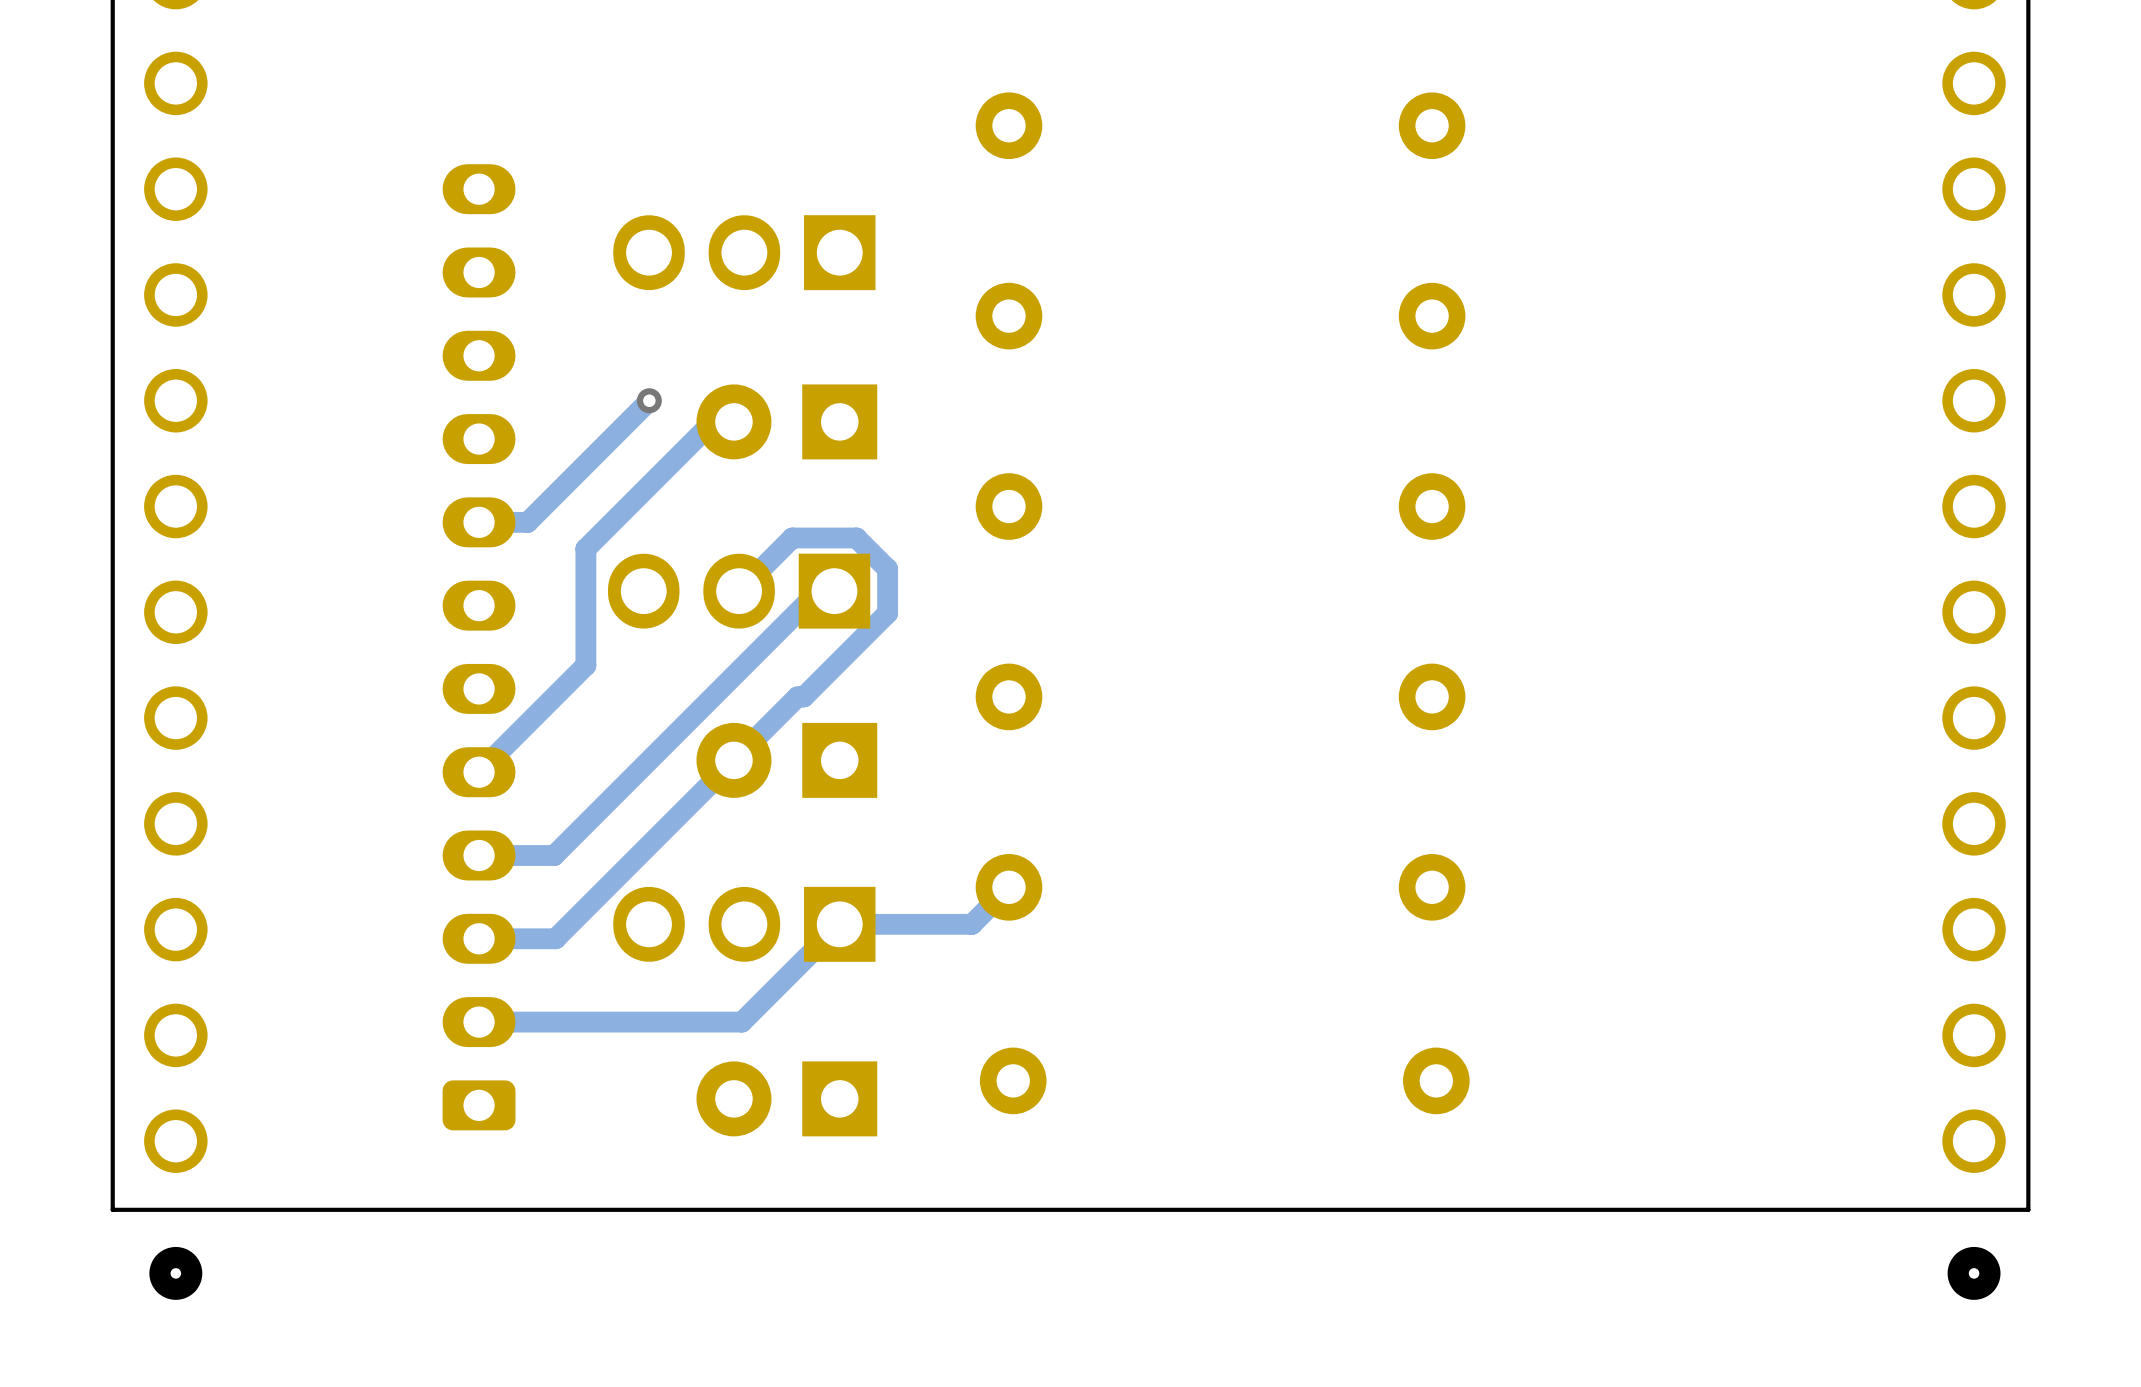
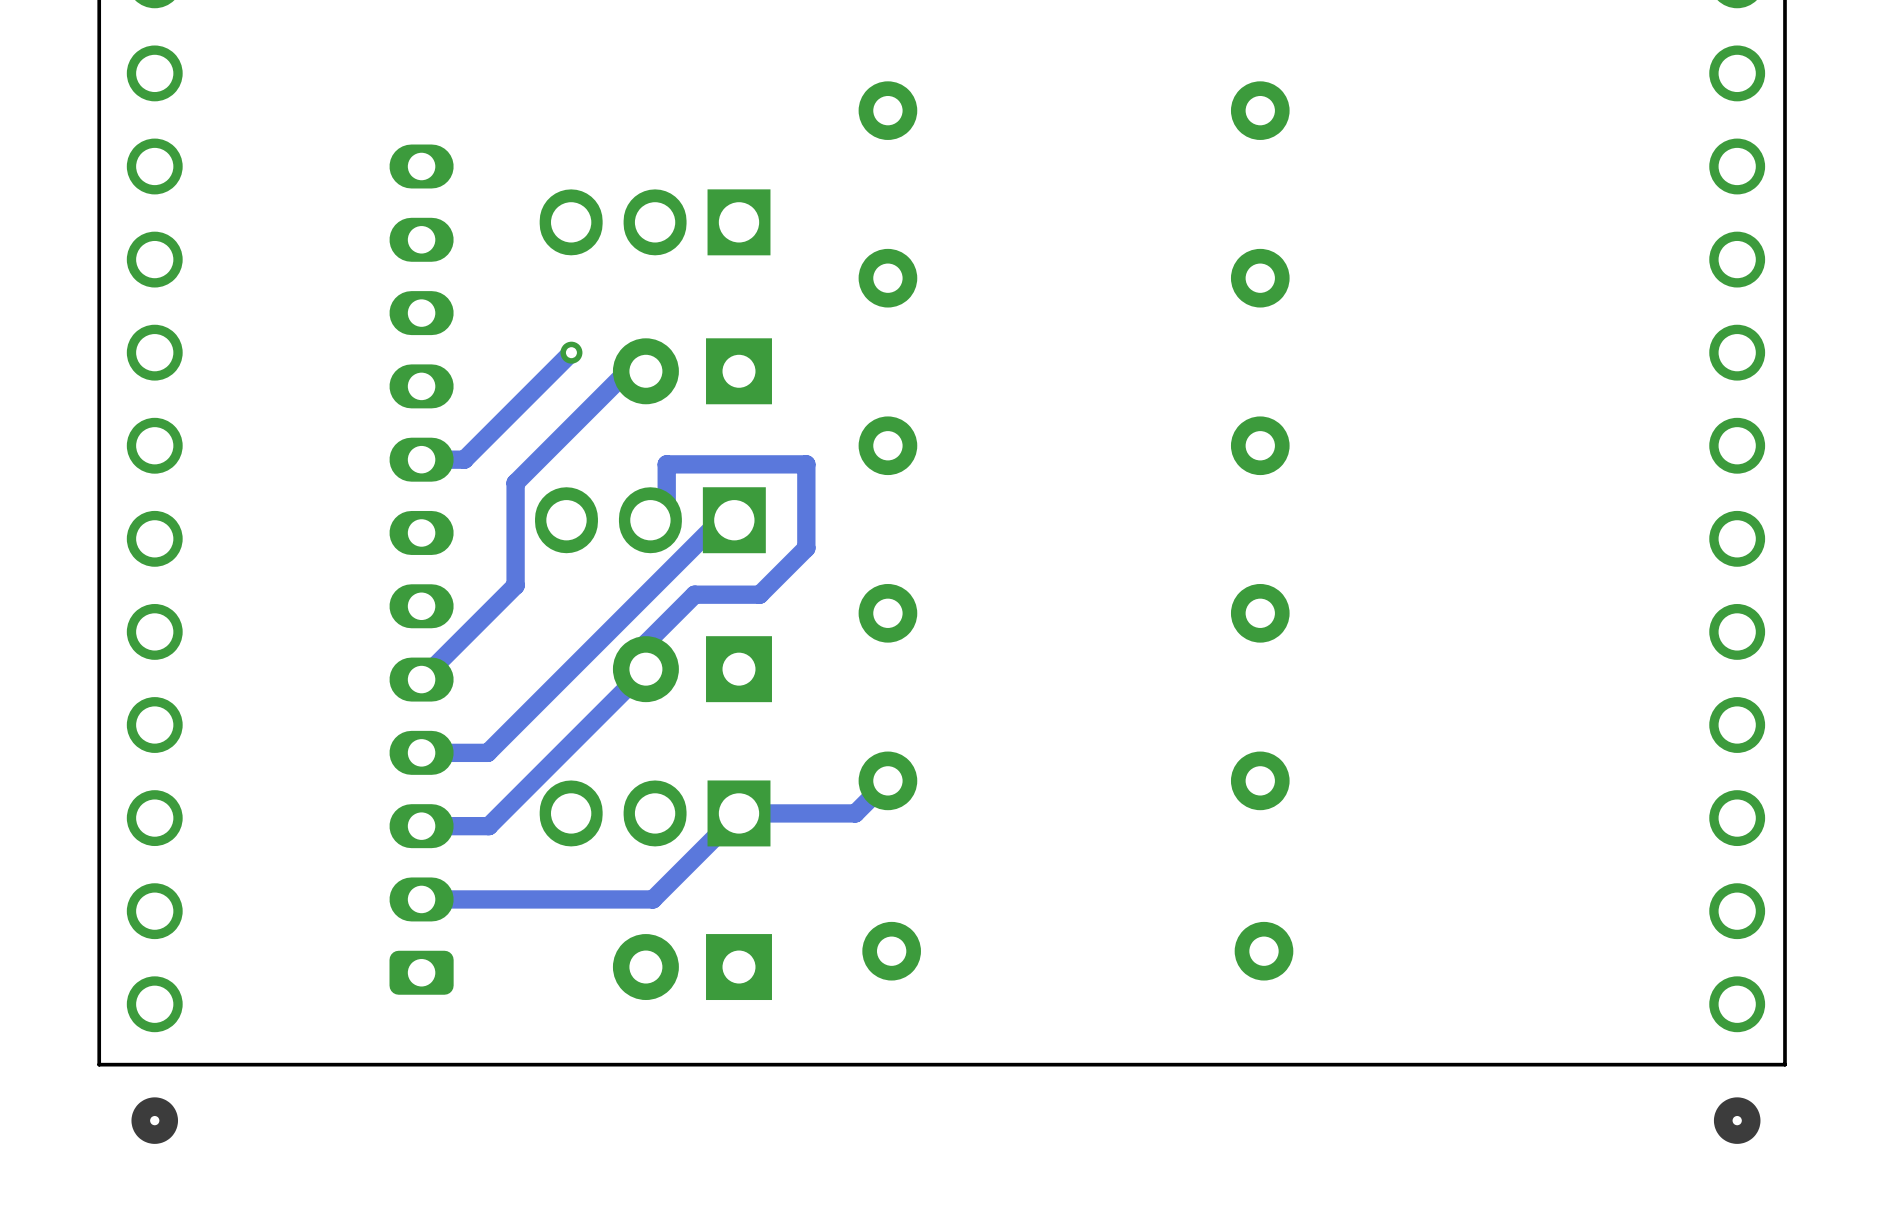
track: (757, 572) (792, 537) (856, 537) (887, 569) (887, 613) (803, 696) (797, 696) (733, 760) -> (666, 503) (666, 464) (806, 464) (806, 548) (759, 594) (694, 594) (645, 643) (645, 669)

